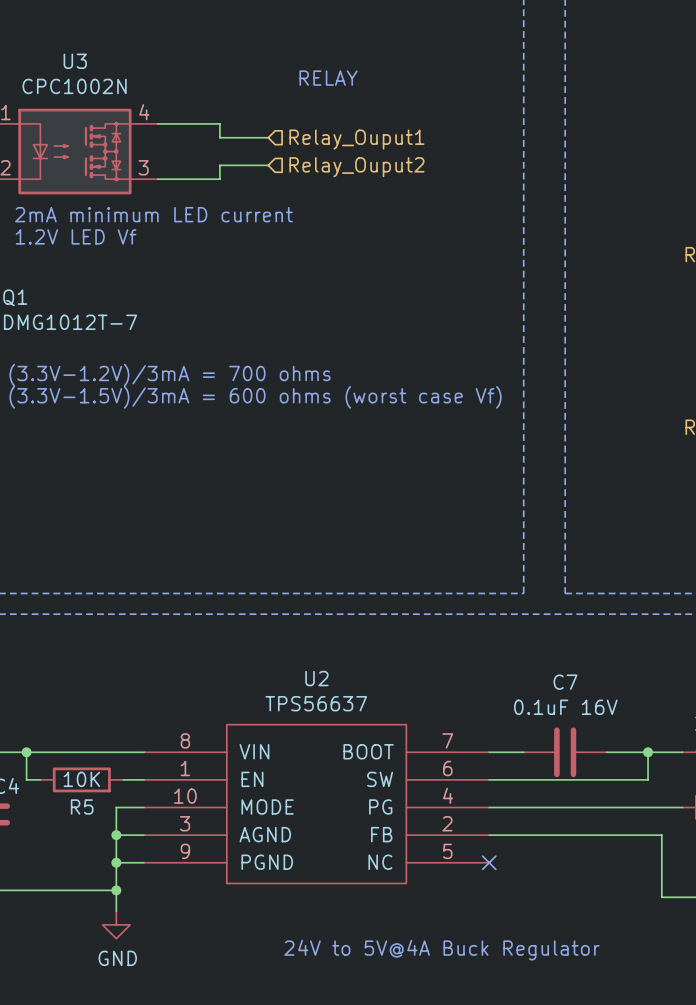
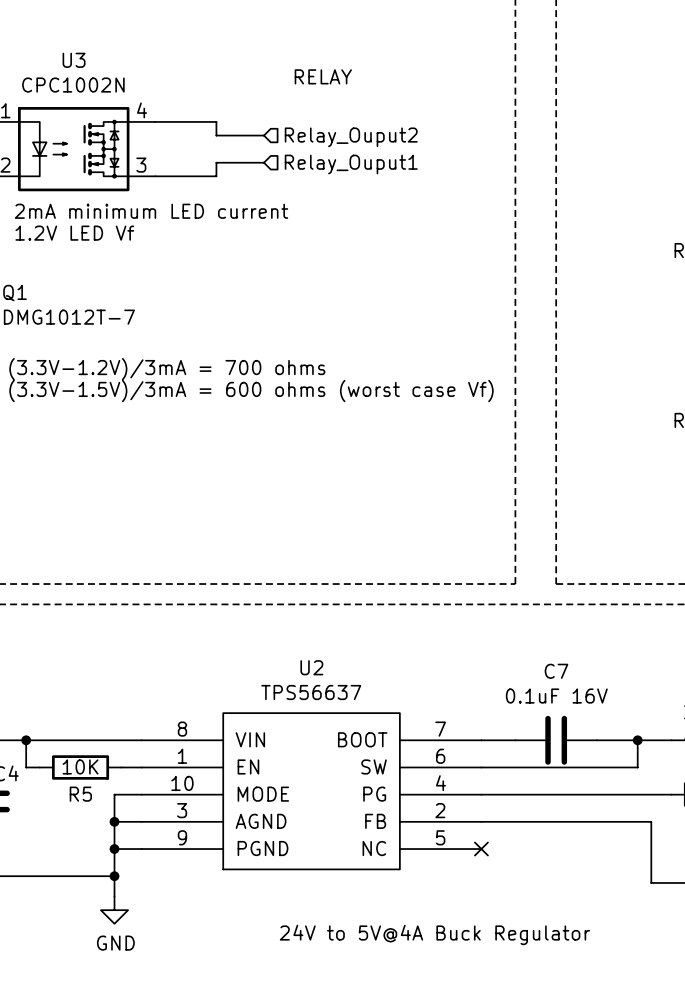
hierarchical label: Relay_Ouput1 (356, 139) -> Relay_Ouput2 (351, 137)
hierarchical label: Relay_Ouput2 (356, 167) -> Relay_Ouput1 (351, 164)

